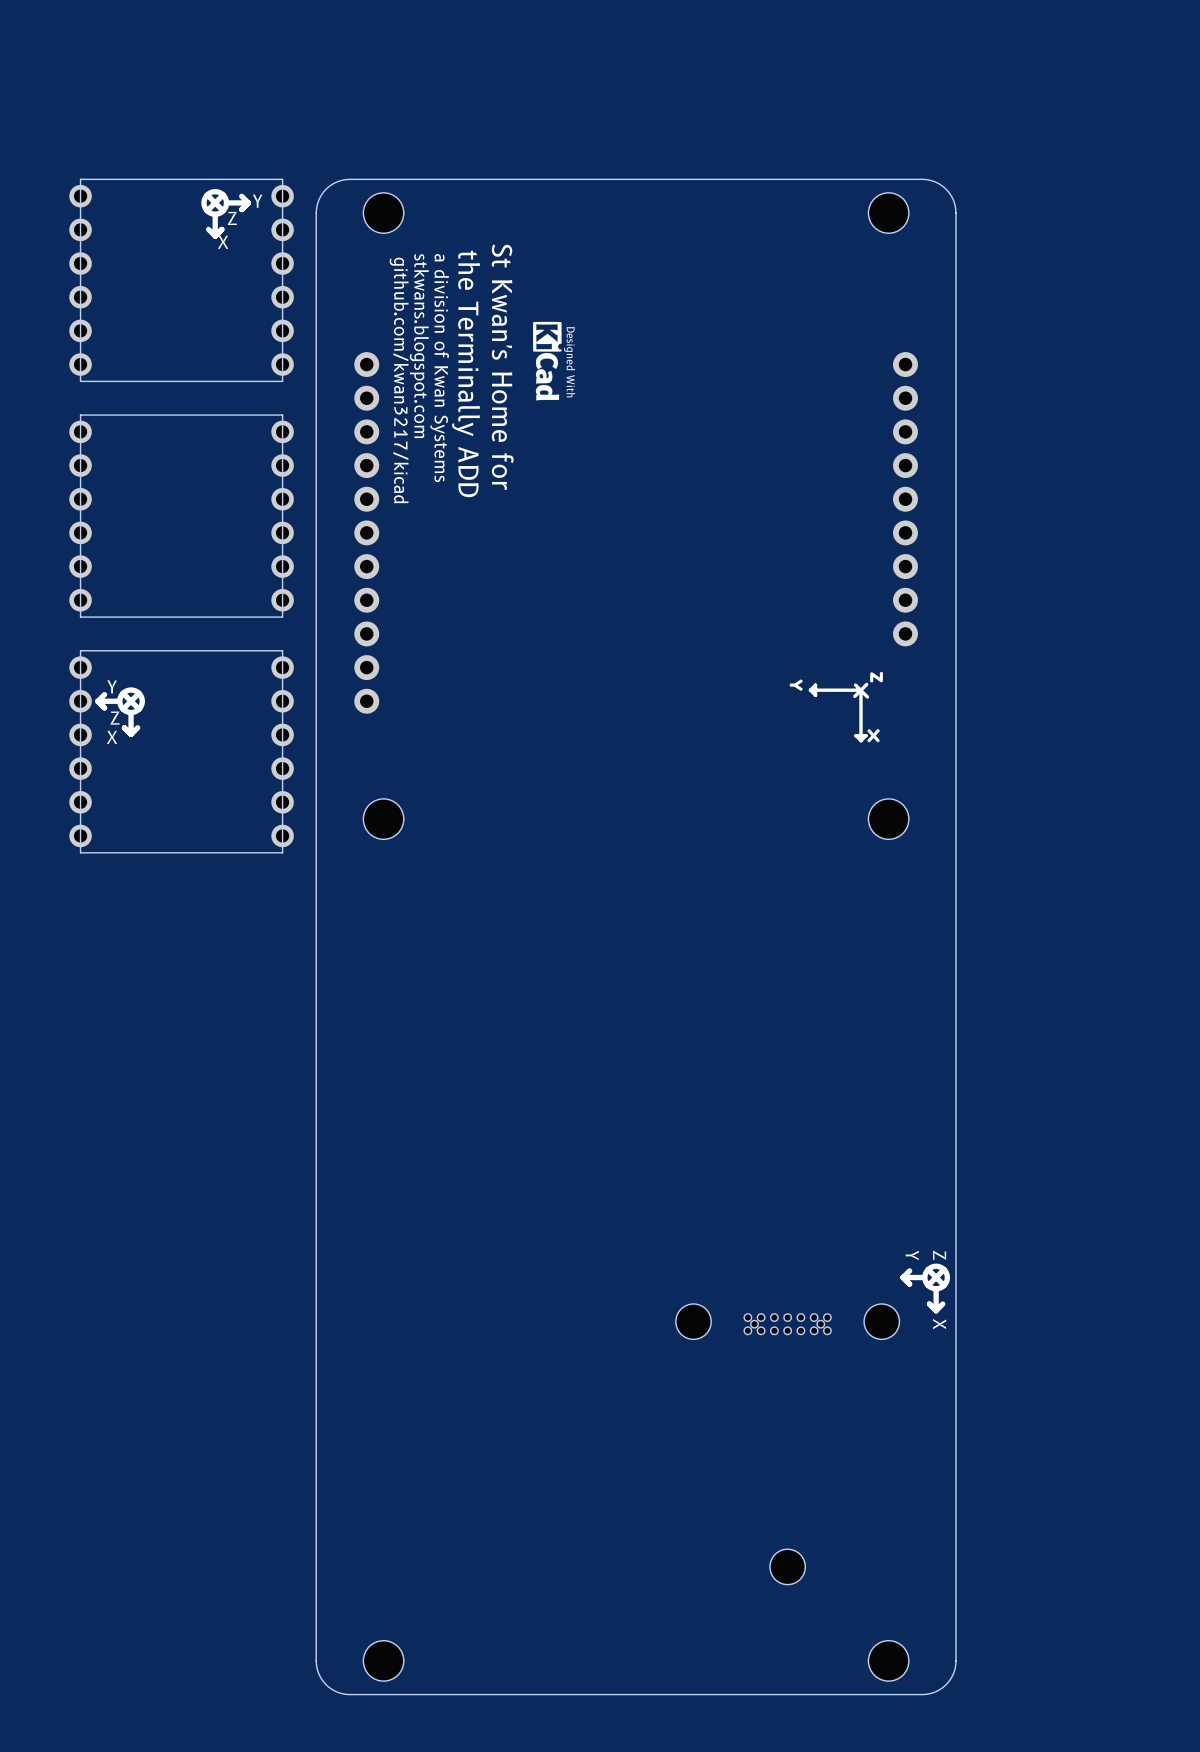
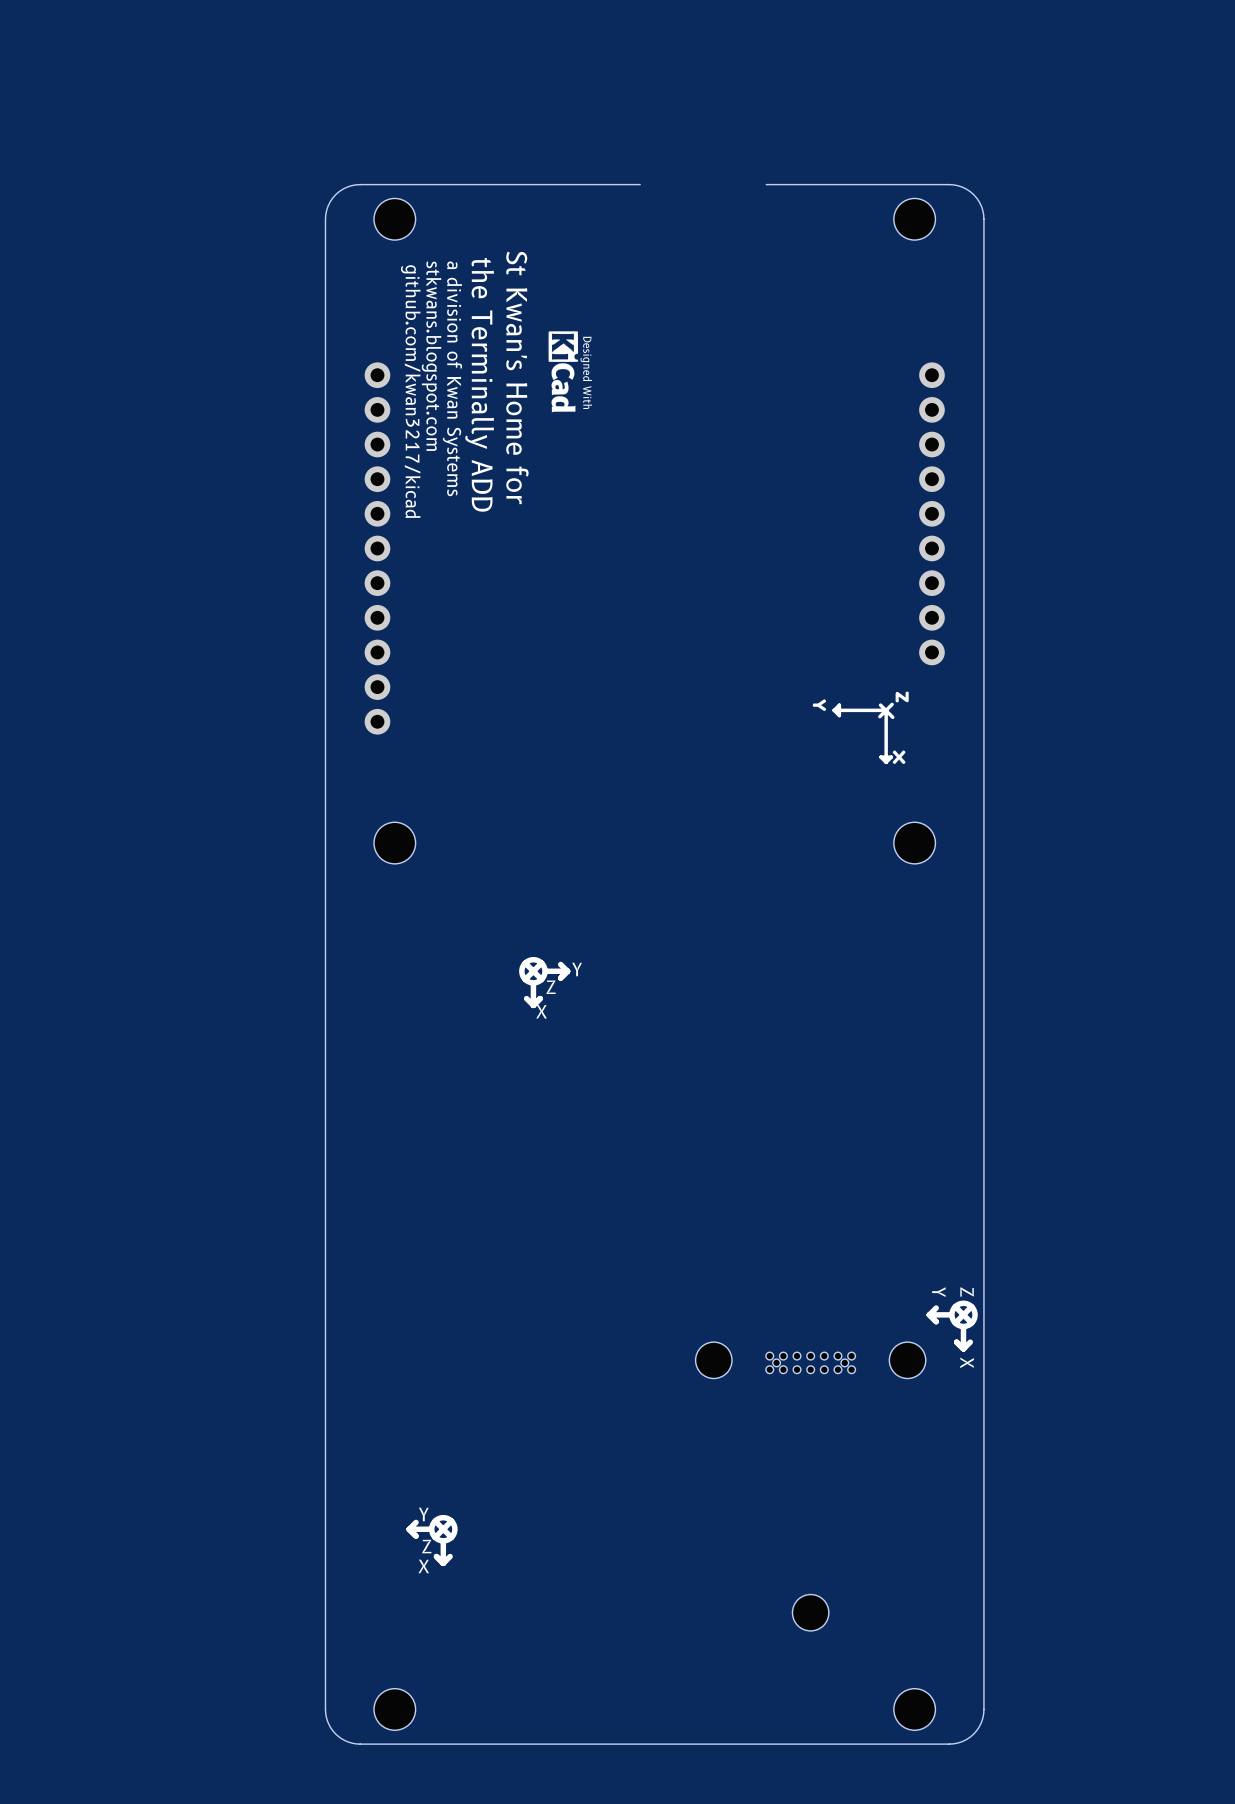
board edge: (744, 179) (622, 179) -> none
drawing: [201, 189, 252, 239] -> none
part: (181, 280) -> none
part: (181, 516) -> none
drawing: [95, 687, 145, 738] -> none
part: (181, 751) -> none
drawing: none -> [519, 956, 571, 1009]
drawing: none -> [406, 1514, 458, 1567]

